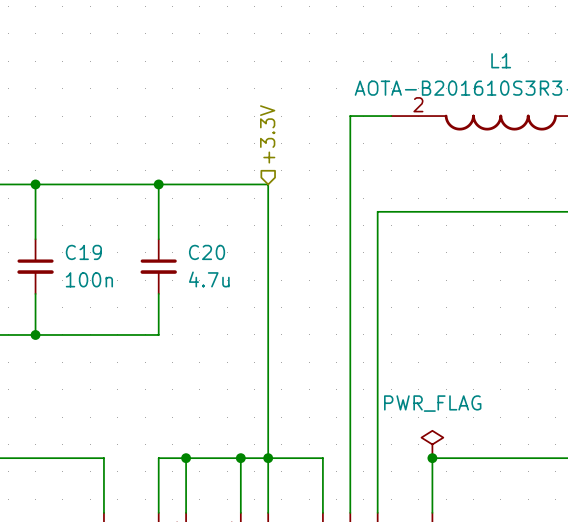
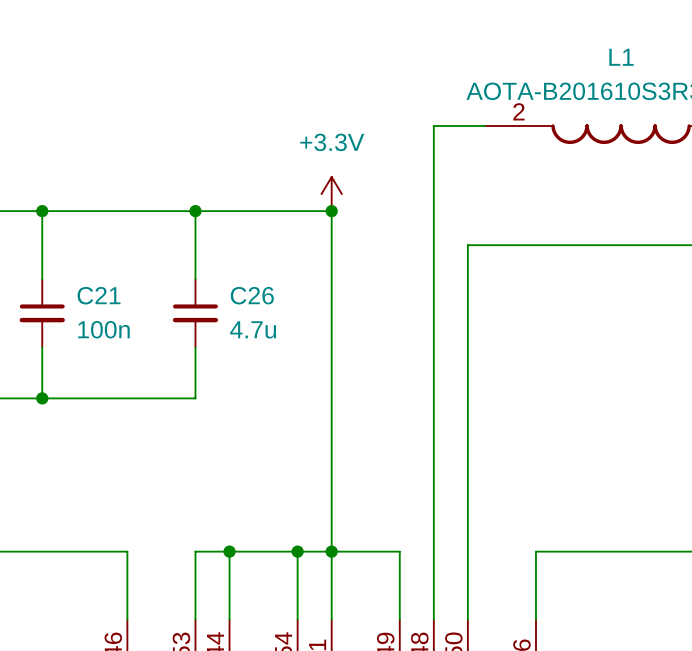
hierarchical label: +3.3V (267, 134) -> none
power symbol: none -> +3.3V (331, 194)
junction: none -> (331, 211)
C19 name: C19 (83, 252) -> C21 (99, 295)
C20 name: C20 (207, 252) -> C26 (252, 295)
power symbol: PWR_FLAG (432, 444) -> none
junction: (432, 458) -> none

